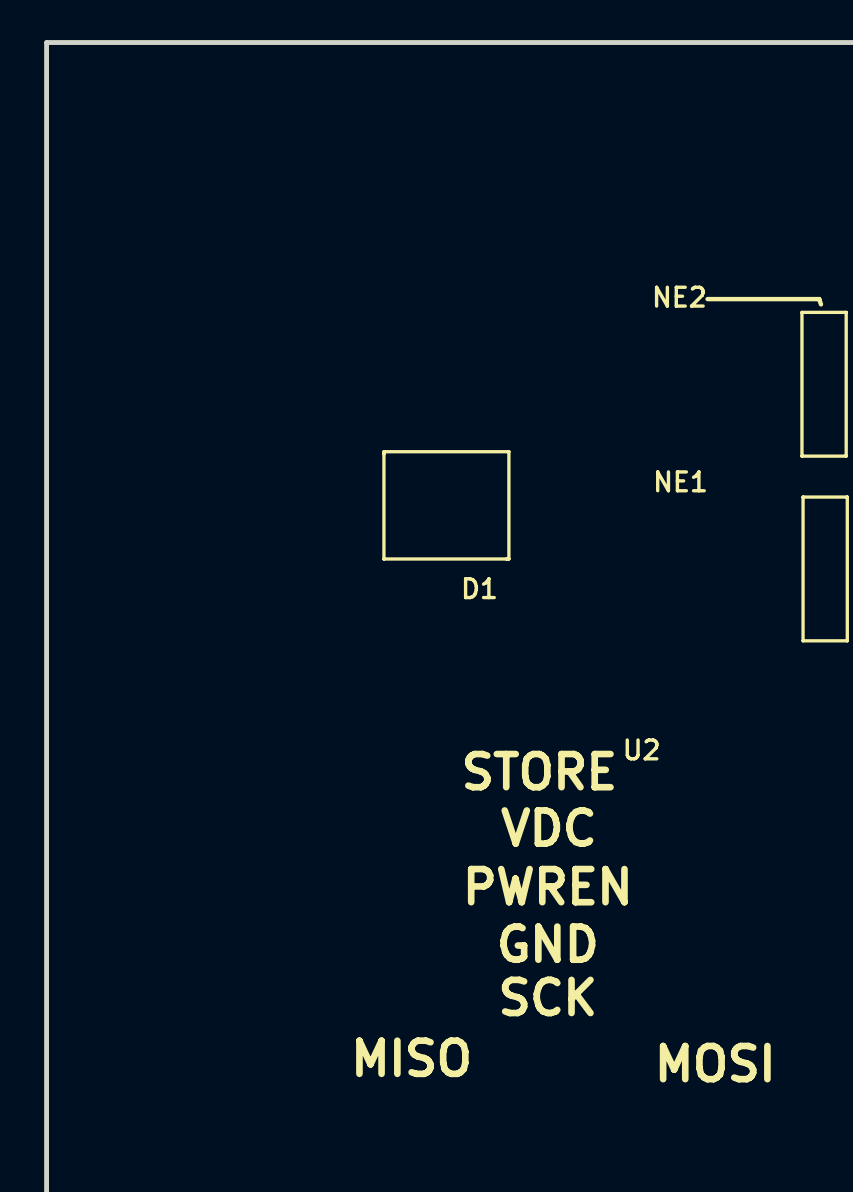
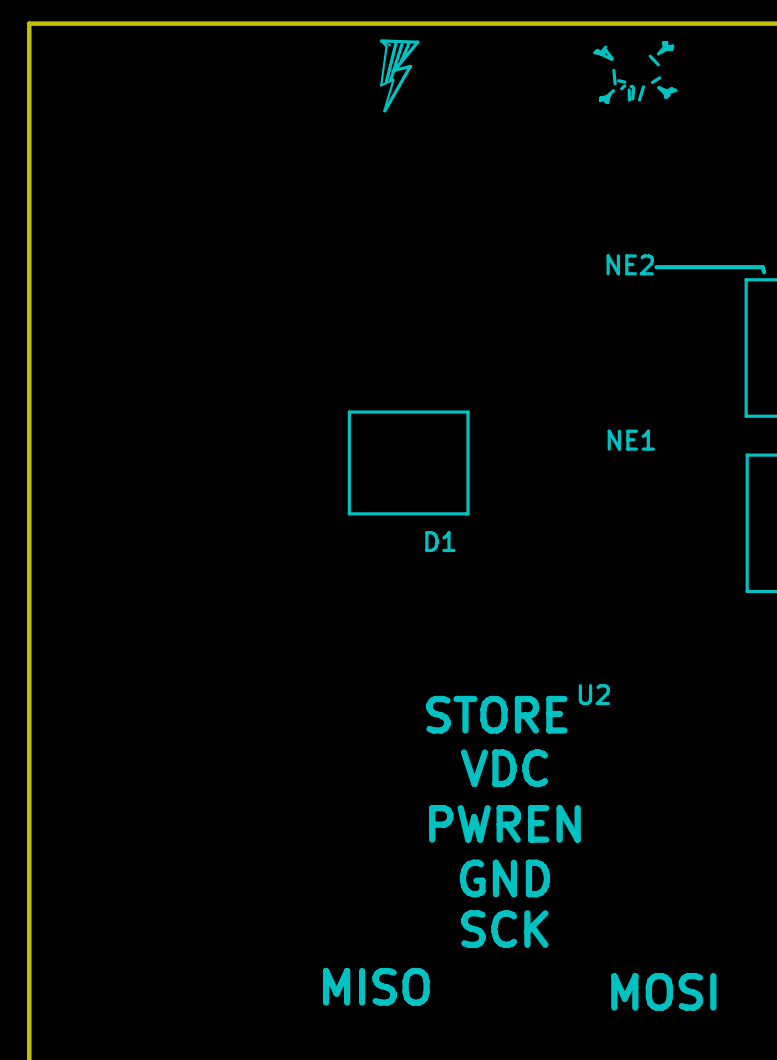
line: none -> (384, 42) (389, 45)
line: none -> (395, 43) (386, 82)
line: none -> (408, 44) (401, 60)
line: none -> (401, 44) (390, 80)
line: none -> (605, 47) (601, 52) (597, 50) (594, 52) (601, 54)
line: none -> (661, 52) (665, 49) (671, 49) (672, 46) (665, 46) (666, 42) (663, 42) (664, 47) (658, 54)
line: none -> (650, 56) (658, 64)
line: none -> (612, 58) (606, 50) (601, 54) (611, 59)
line: none -> (613, 70) (615, 83)
line: none -> (659, 77) (652, 82)
line: none -> (618, 80) (624, 82)
line: none -> (624, 85) (621, 88)
line: none -> (632, 86) (631, 86)
line: none -> (643, 86) (639, 99)
line: none -> (658, 87) (664, 93) (665, 97) (668, 95) (666, 93) (675, 90) (671, 88) (666, 91) (659, 87)
line: none -> (633, 88) (632, 98)
line: none -> (629, 89) (629, 100)
line: none -> (613, 90) (606, 96) (600, 97) (600, 100) (605, 99) (607, 102) (610, 93)
line: none -> (384, 110) (393, 79) (381, 85) (386, 46) (381, 40) (417, 42) (394, 70) (410, 66) (384, 110)

